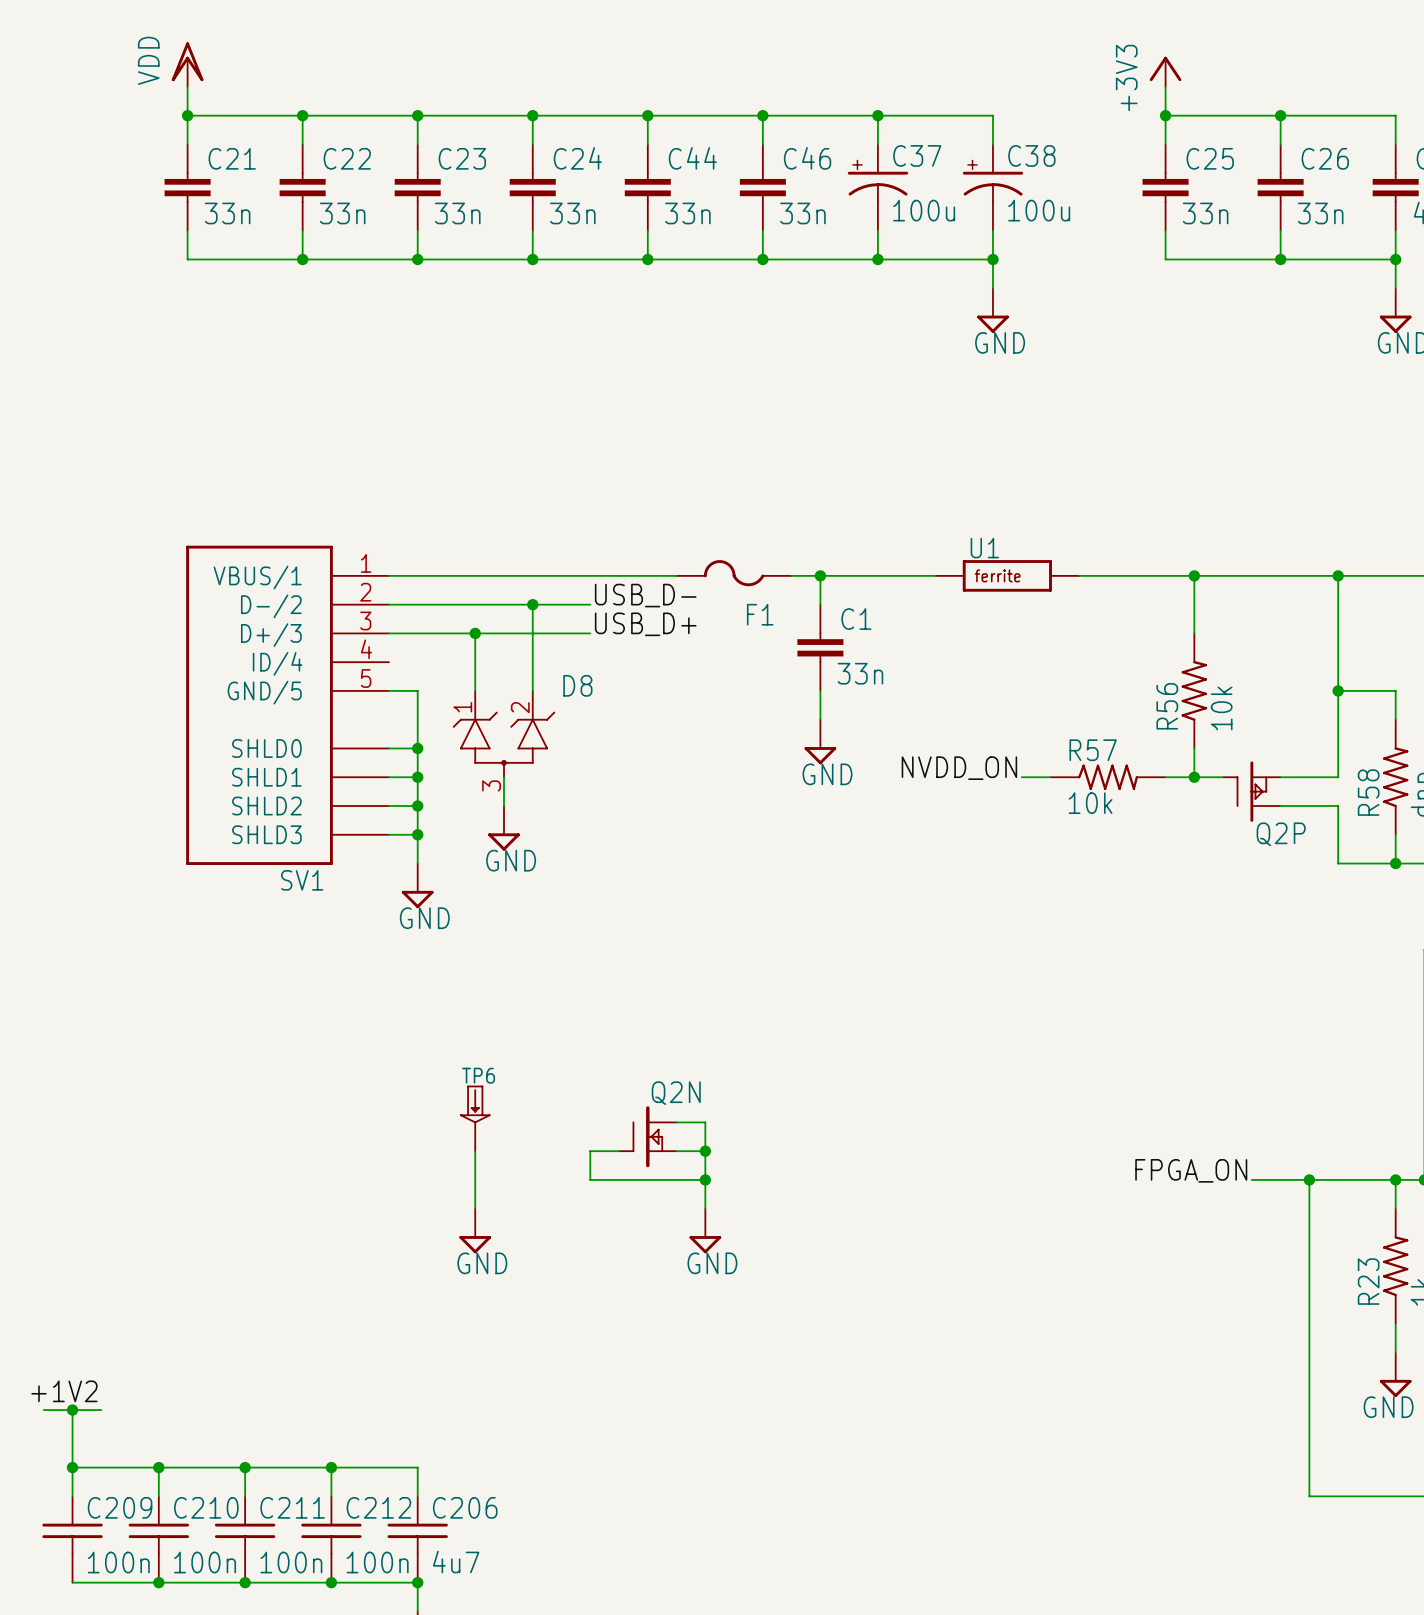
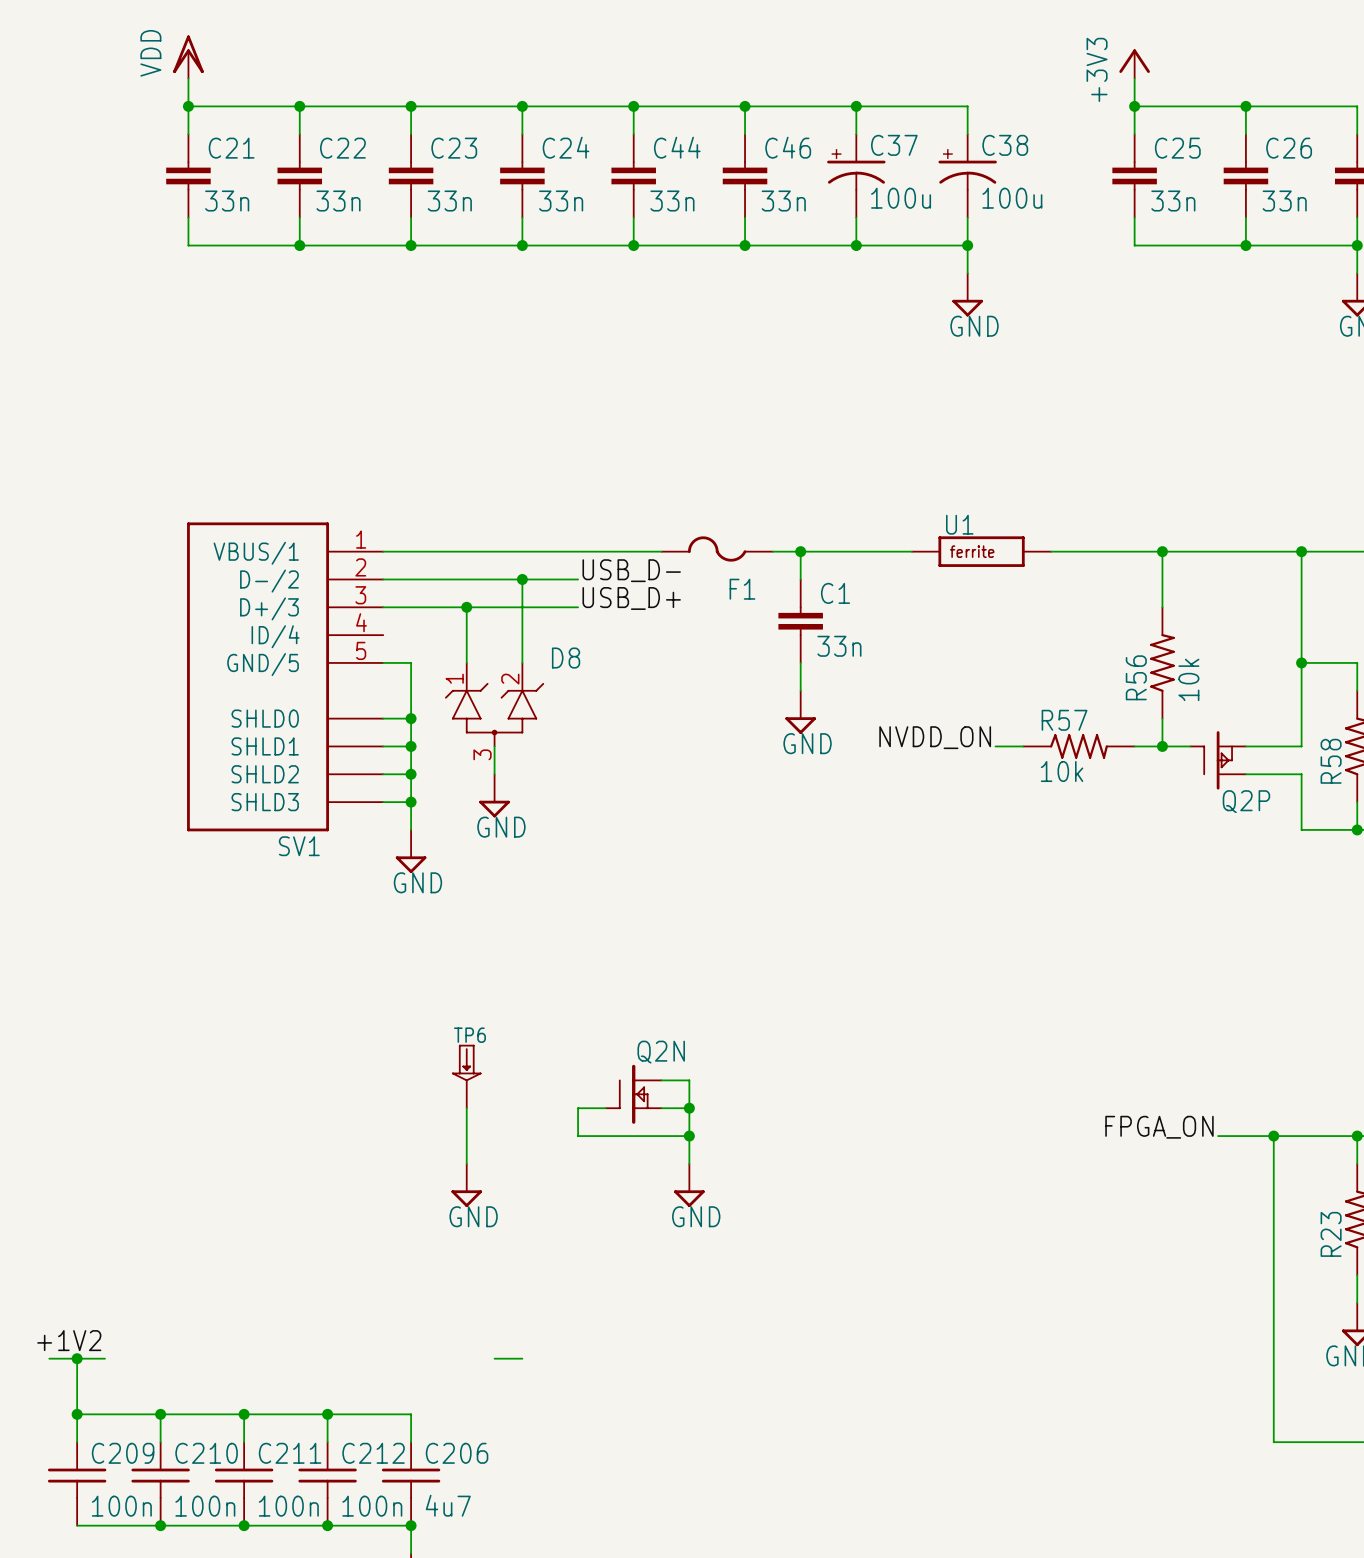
wire: none -> (494, 1358) (522, 1358)

